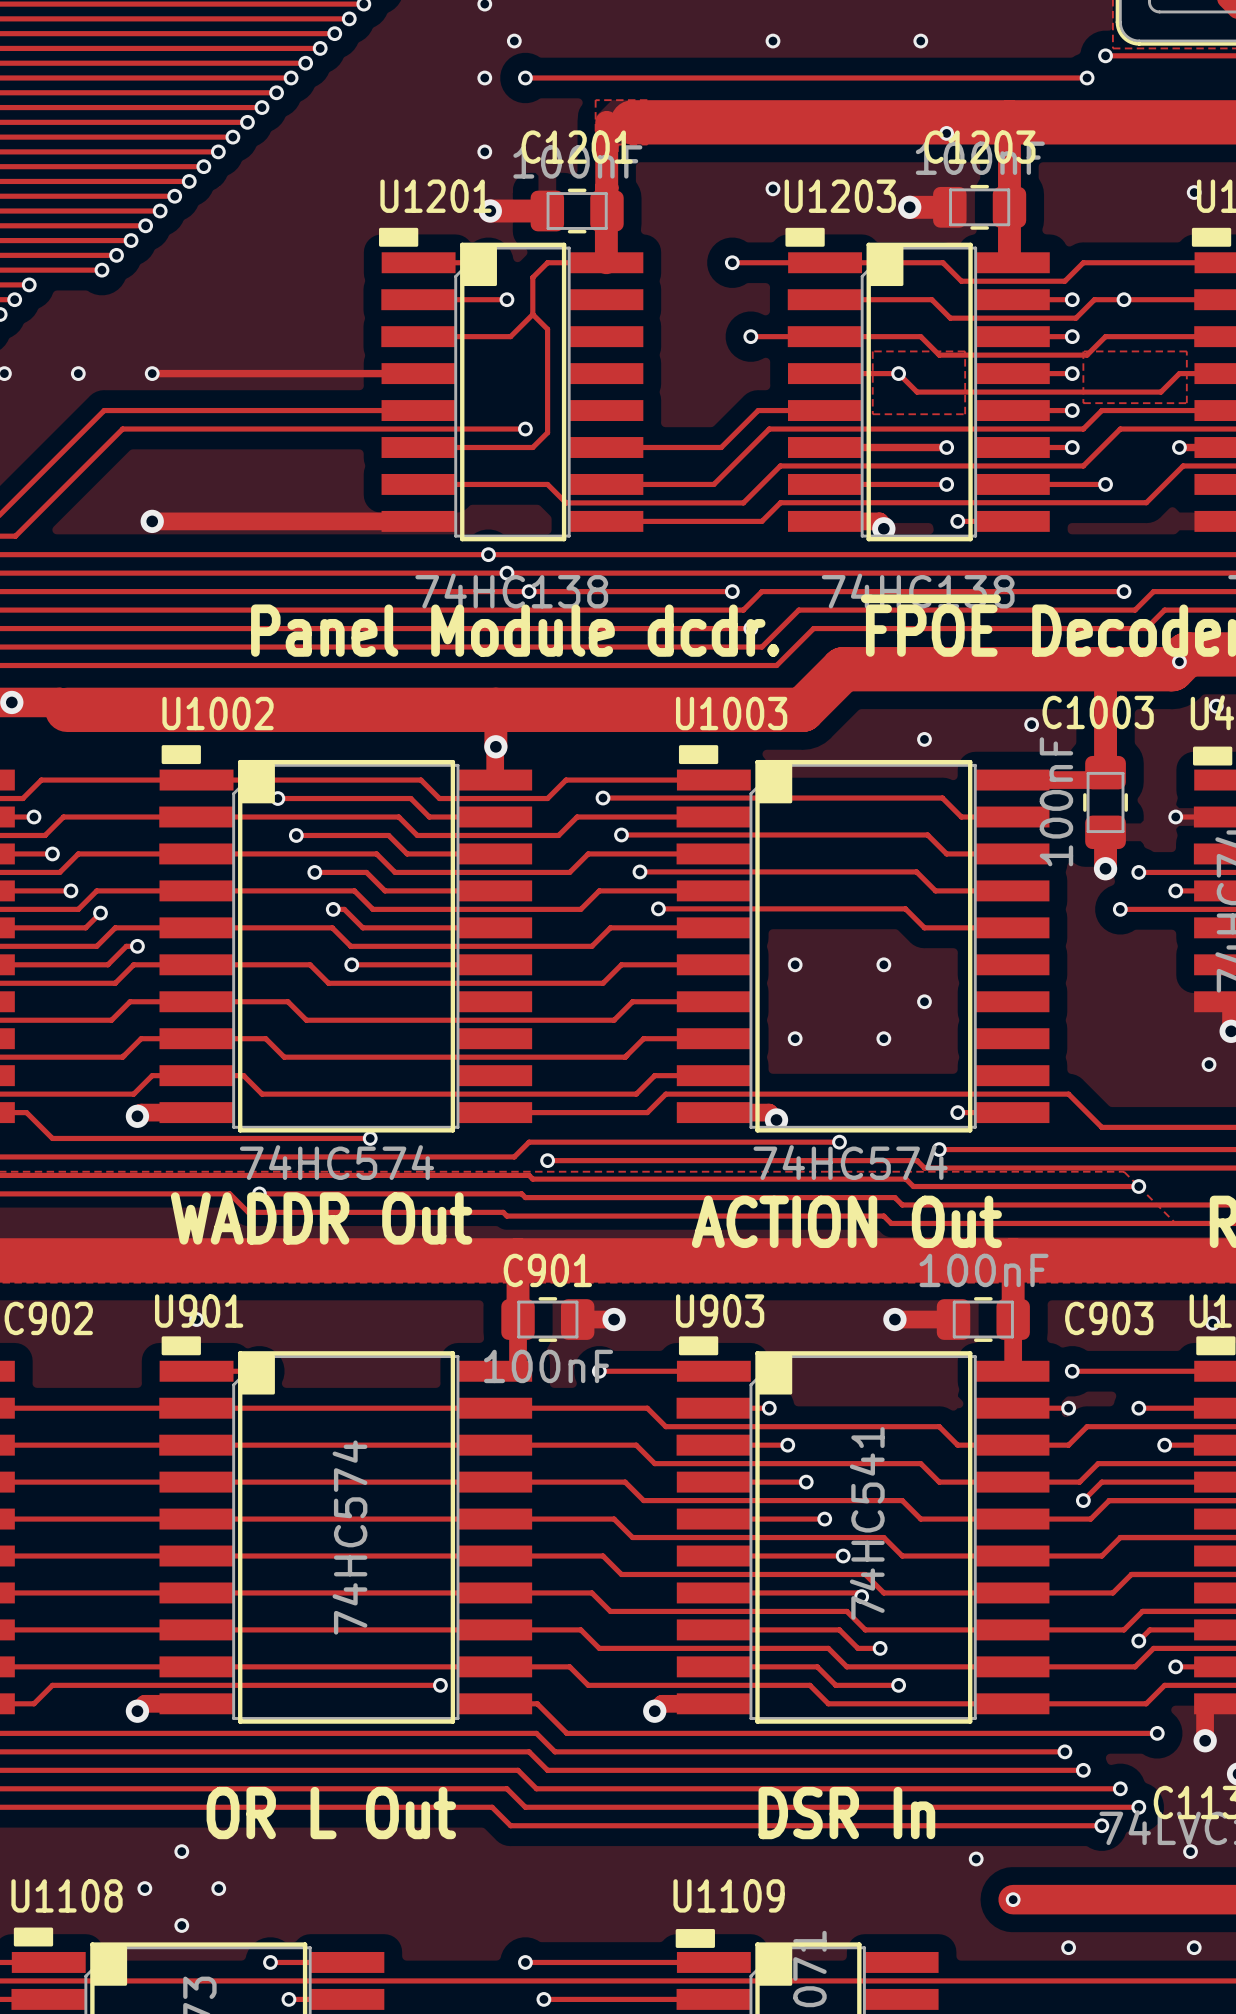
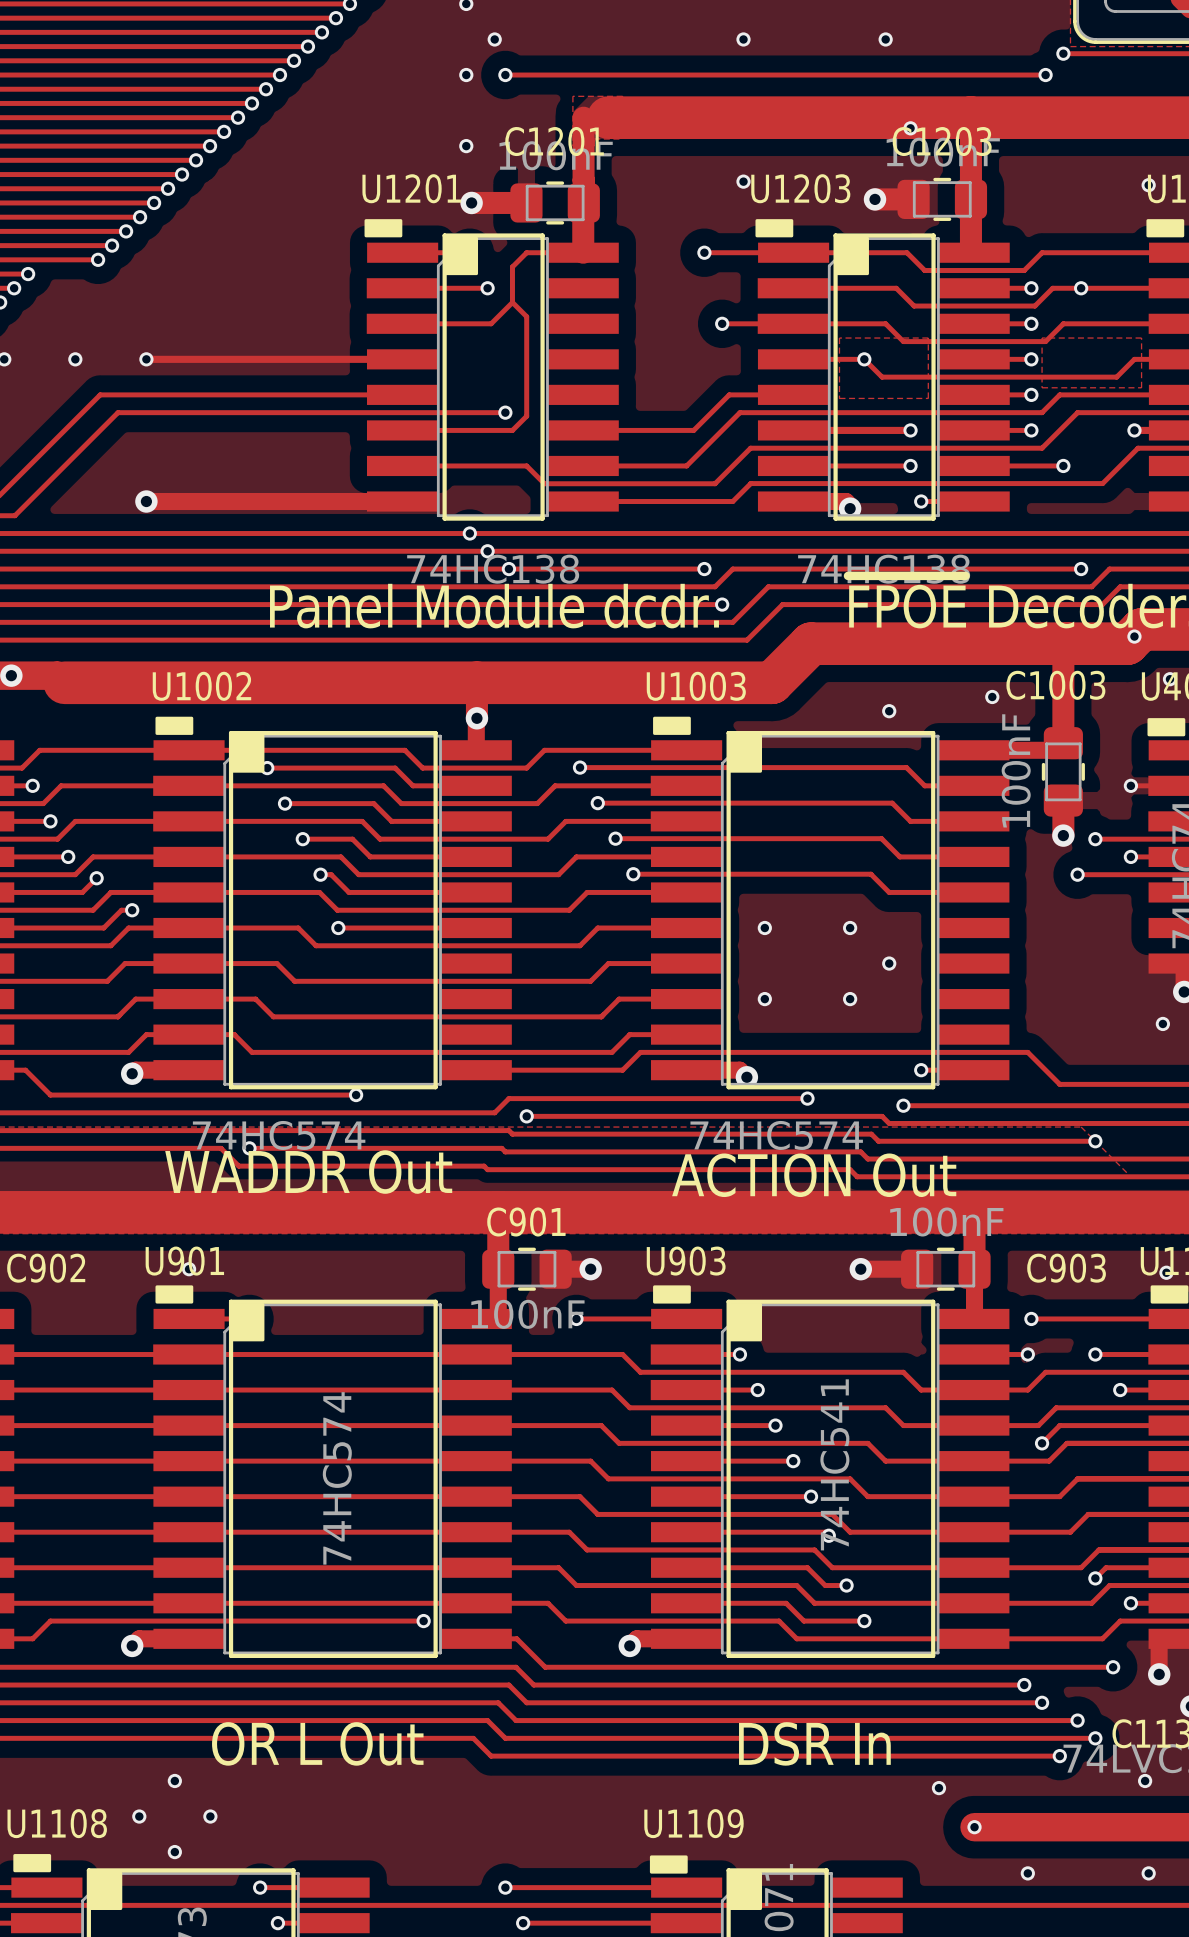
U1002 value position: 74HC574 (336, 1162) -> 74HC574 (279, 1135)
U1003 value position: 74HC574 (850, 1162) -> 74HC574 (776, 1135)

